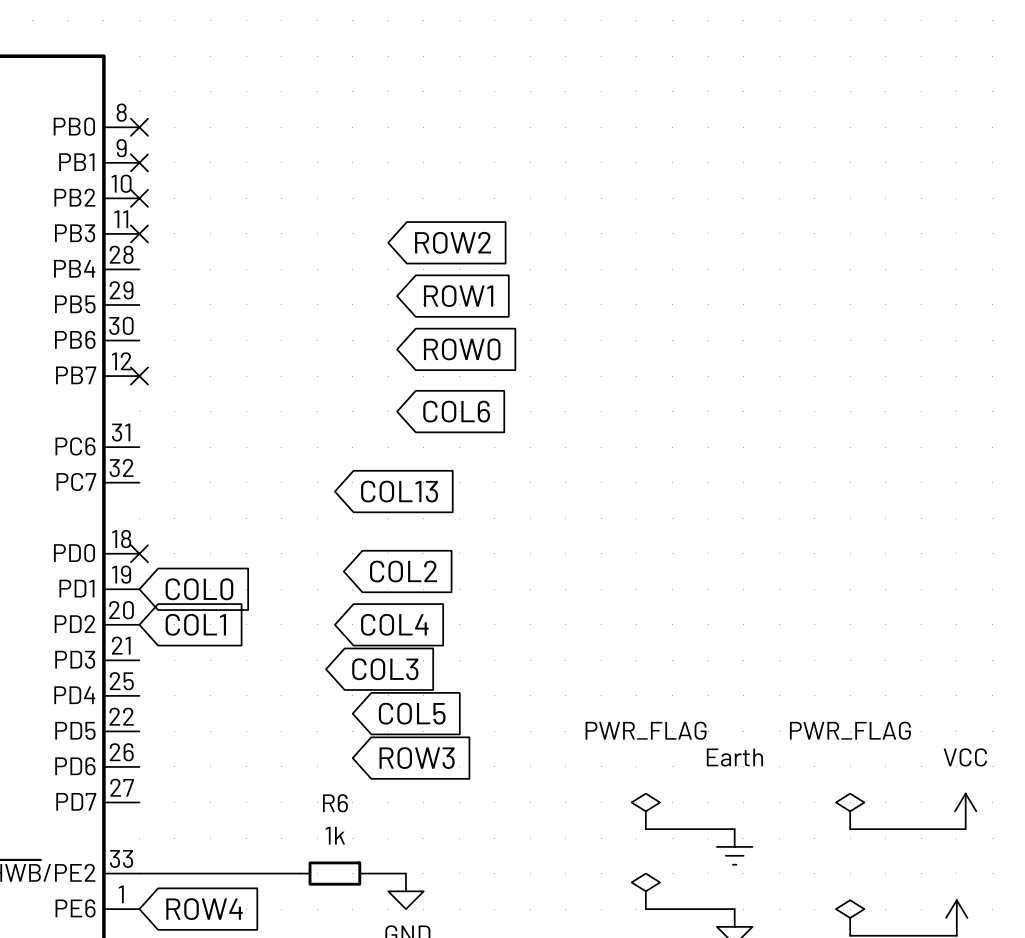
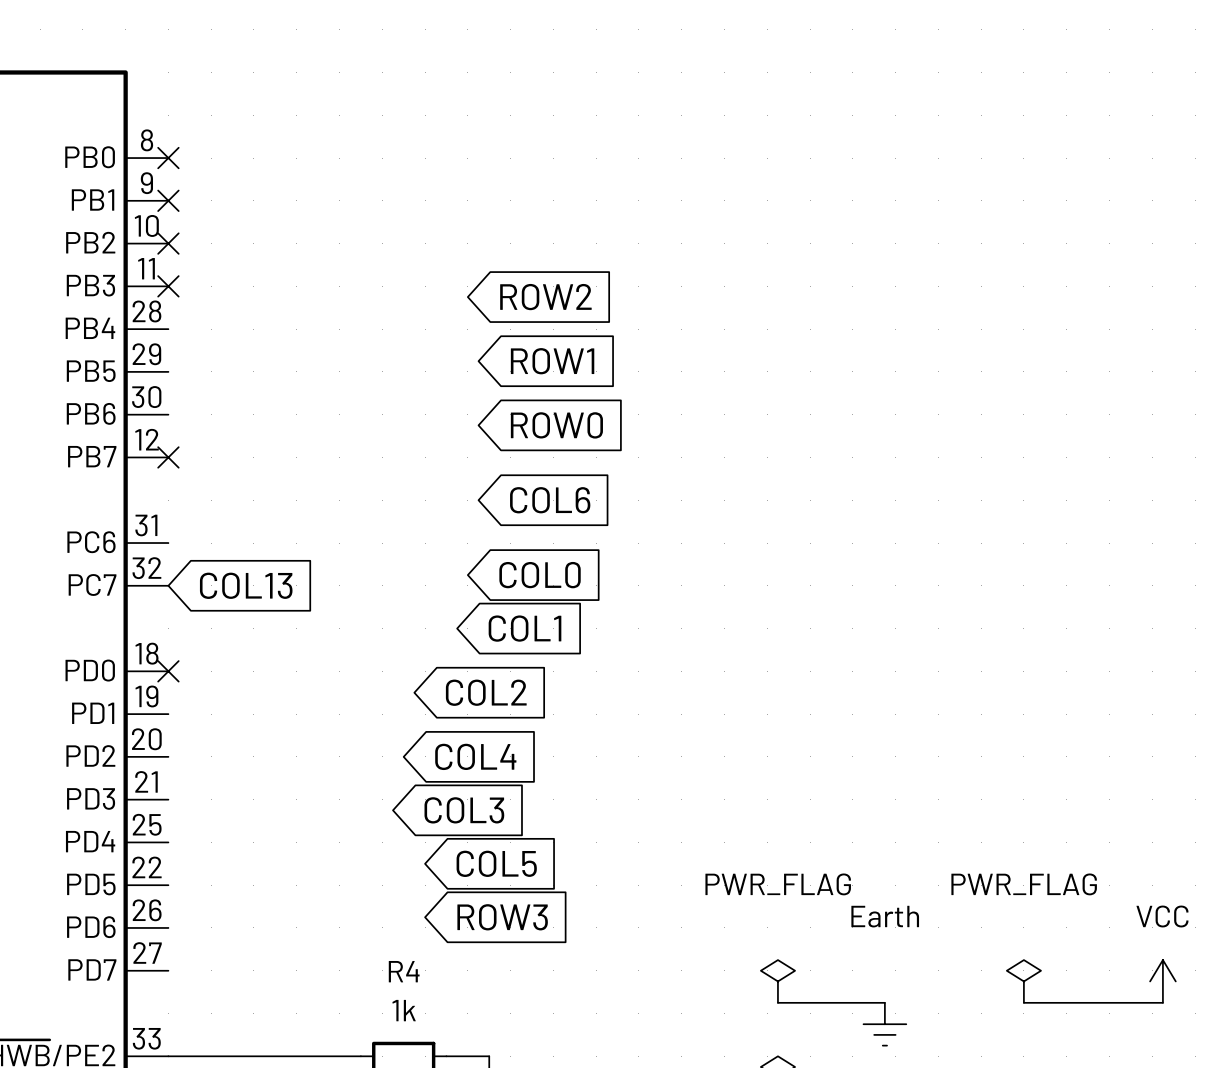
global label position: COL13 (399, 491) -> COL13 (246, 585)
global label position: COL0 (199, 589) -> COL0 (540, 575)
global label position: COL1 (195, 624) -> COL1 (525, 628)
R6 name: R6 (335, 803) -> R4 (404, 971)

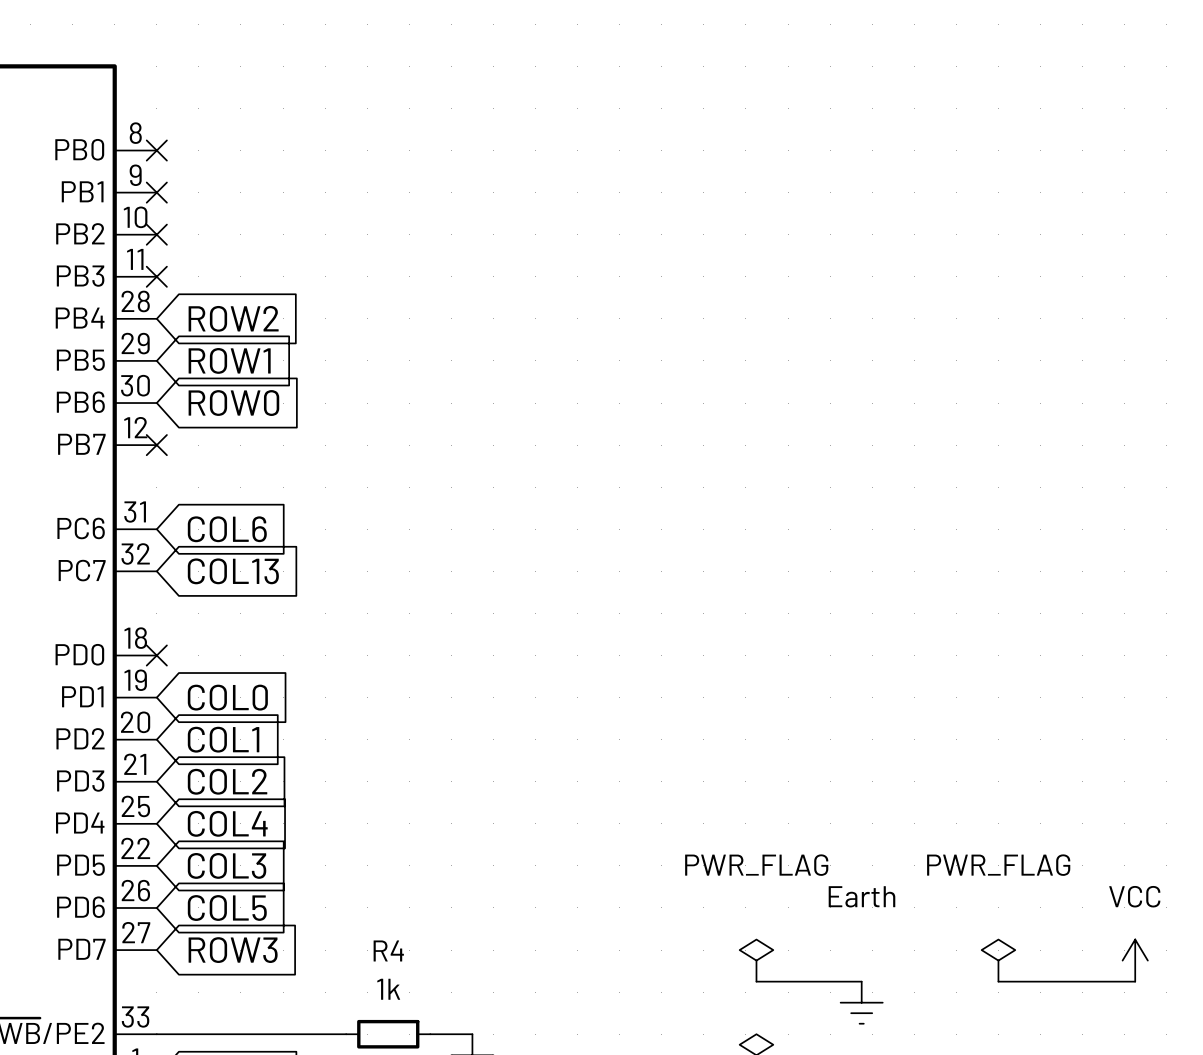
global label position: ROW2 (545, 297) -> ROW2 (233, 318)
global label position: ROW1 (552, 361) -> ROW1 (229, 360)
global label position: ROW0 (556, 425) -> ROW0 (233, 403)
global label position: COL6 (550, 500) -> COL6 (227, 529)
global label position: COL0 (540, 575) -> COL0 (227, 697)
global label position: COL1 (525, 628) -> COL1 (223, 739)
global label position: COL2 (486, 692) -> COL2 (227, 781)
global label position: COL4 (475, 756) -> COL4 (227, 823)
global label position: COL3 (464, 810) -> COL3 (227, 865)
global label position: COL5 (496, 863) -> COL5 (227, 908)
global label position: ROW3 (502, 917) -> ROW3 (233, 950)

